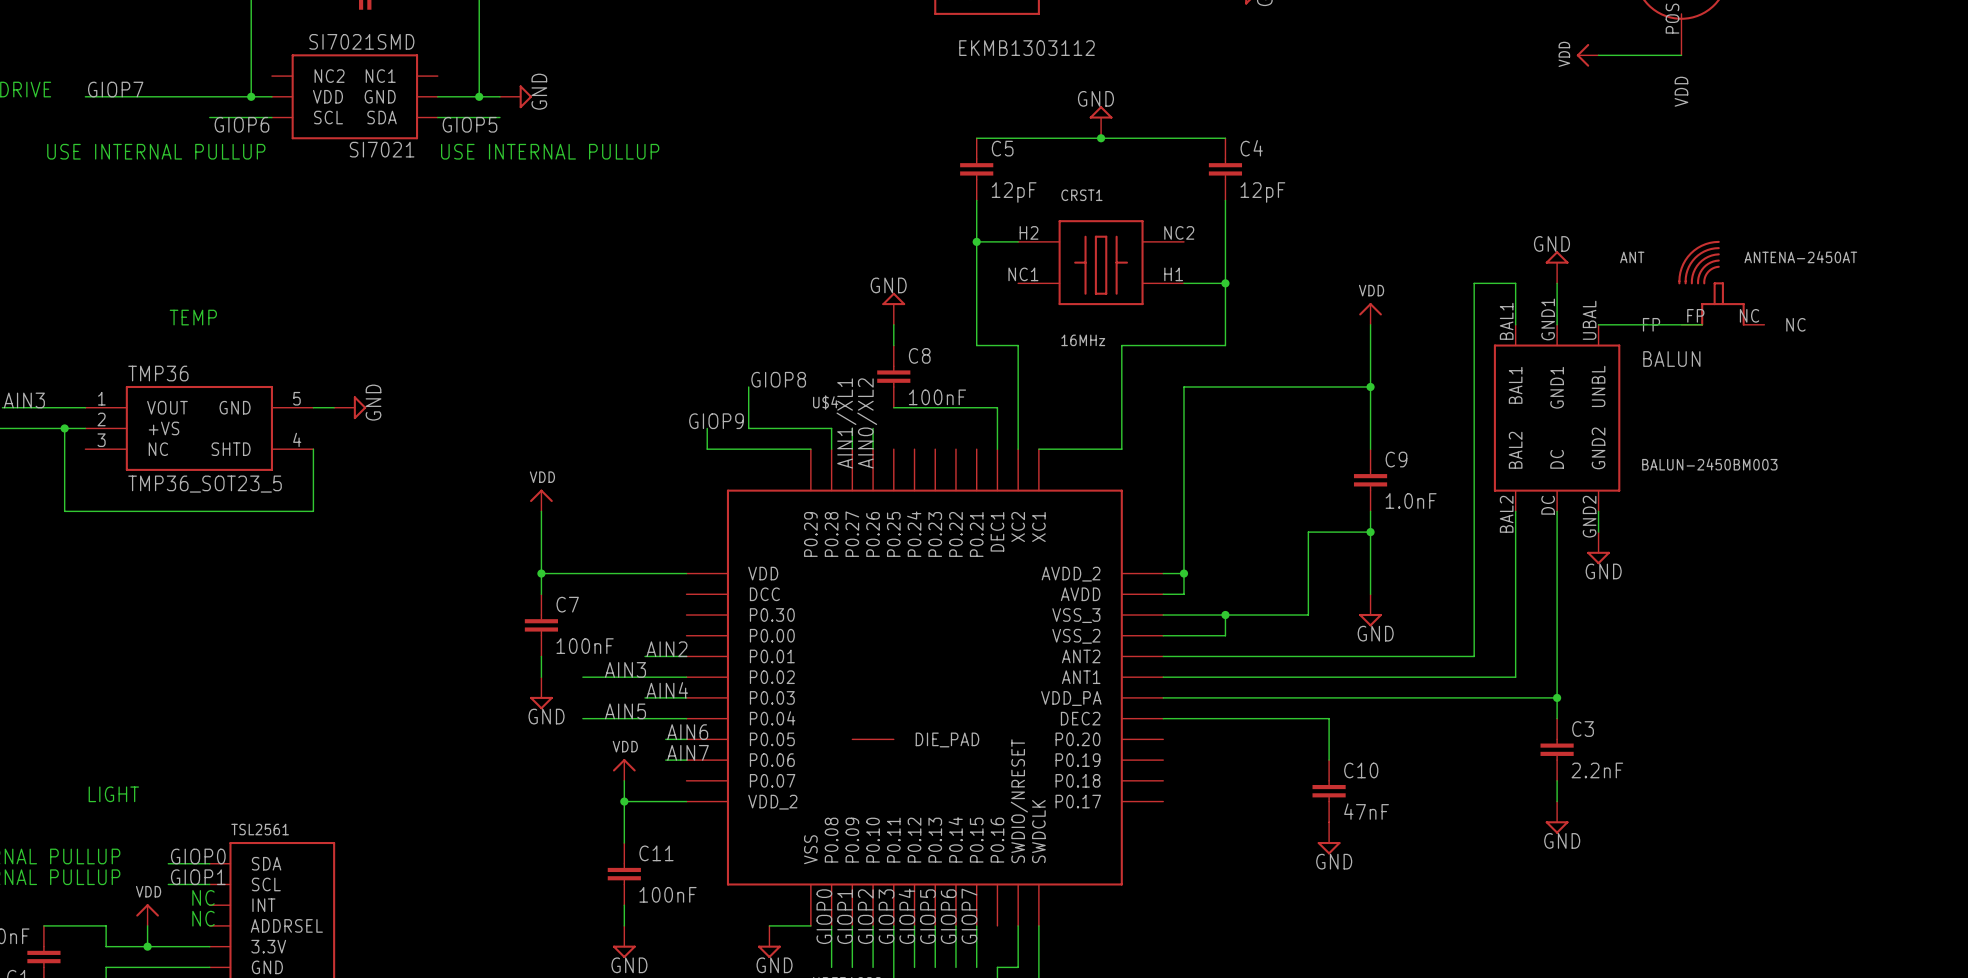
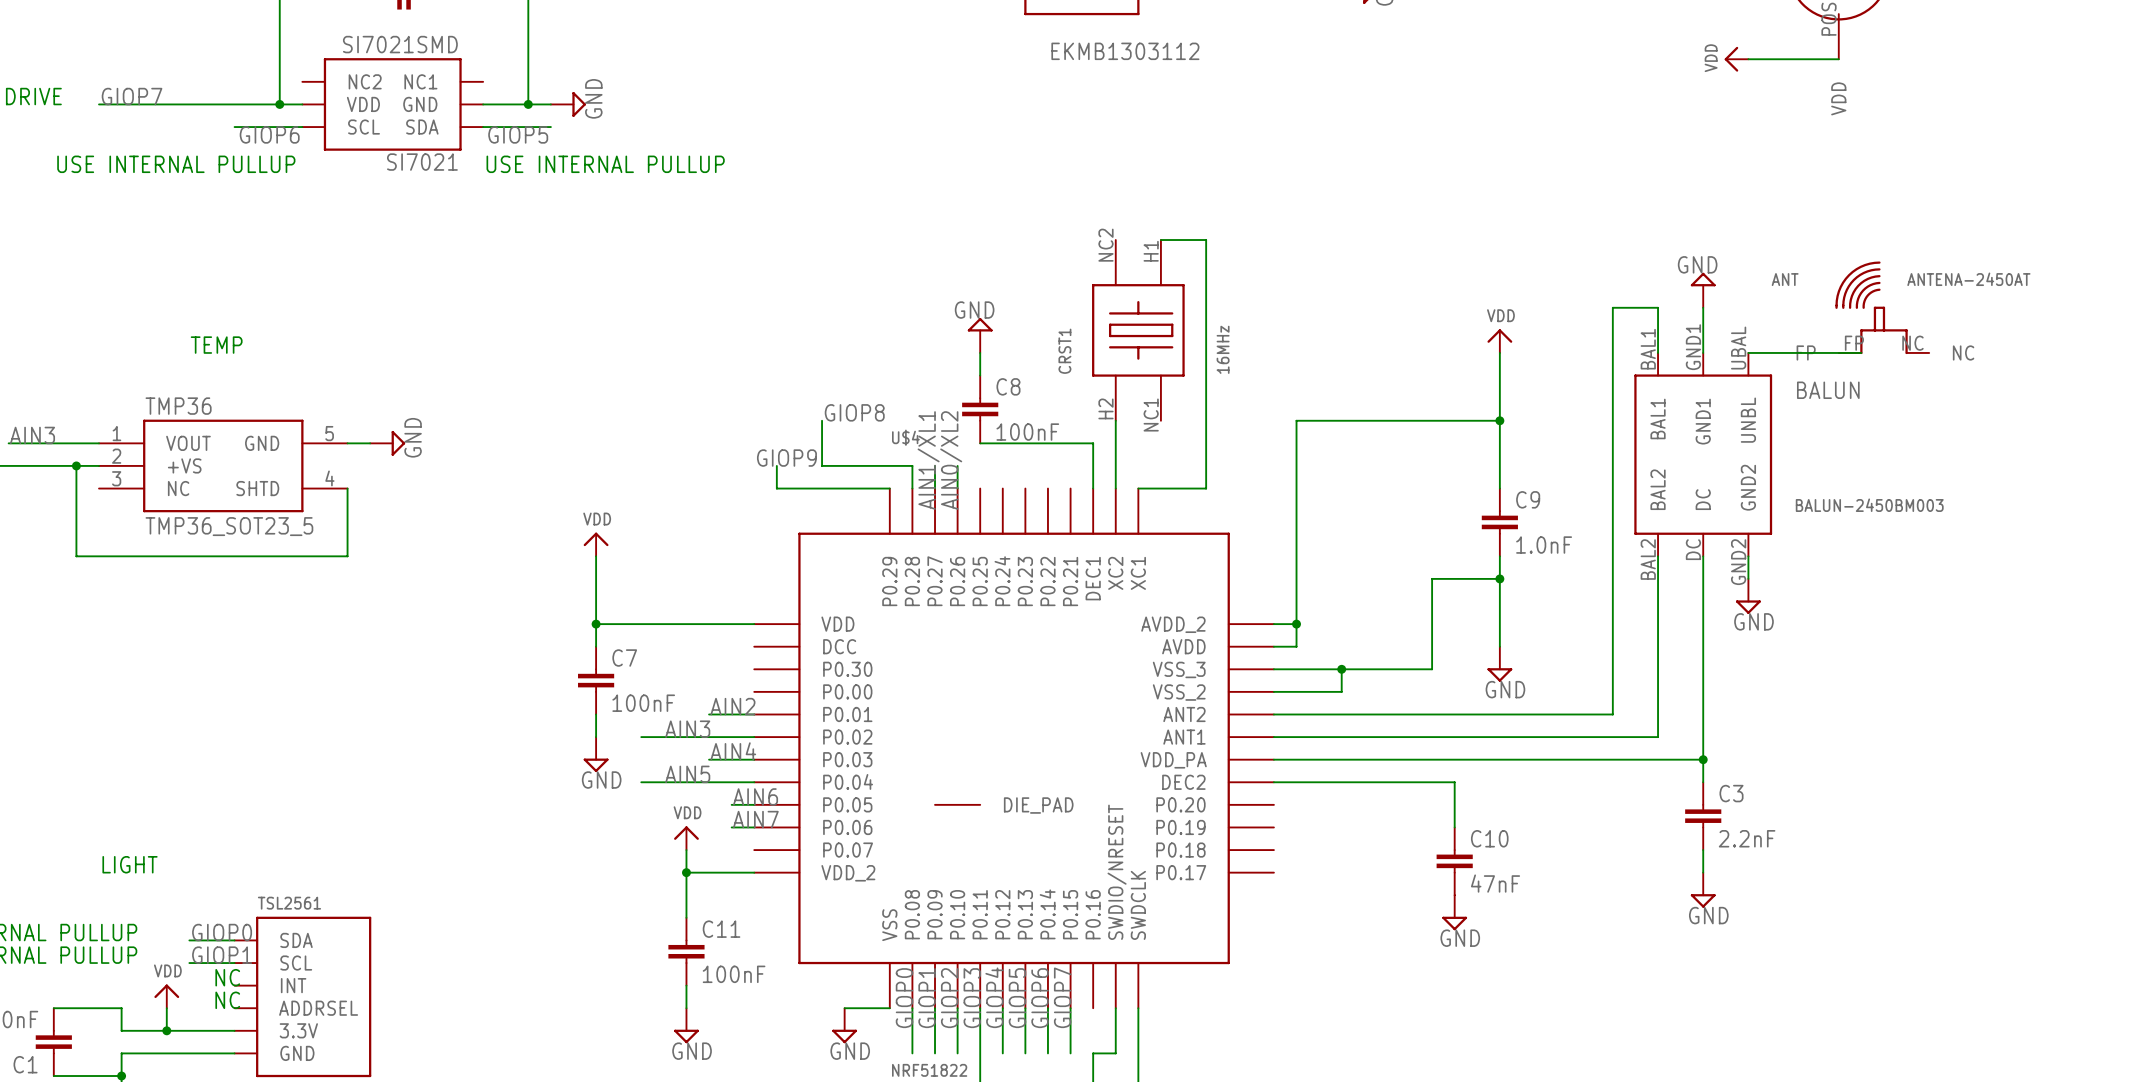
power symbol: GND (1101, 122) -> none
wire: (976, 138) (1225, 138) -> none
junction: (1101, 138) -> none
C5: 12pF (976, 169) -> none
C4: 12pF (1225, 169) -> none
wire: (976, 200) (976, 345) (1018, 345) (1018, 386) -> none
wire: (1225, 200) (1225, 345) (1121, 345) (1121, 449) (1101, 449) -> (1160, 240) (1206, 240) (1206, 488)
wire: (976, 241) (1018, 241) -> none
junction: (976, 241) -> none
CRST1 rotation: 0° (1101, 262) -> 90° counterclockwise (1138, 330)
wire: (1183, 283) (1225, 283) -> none
junction: (1225, 283) -> none

